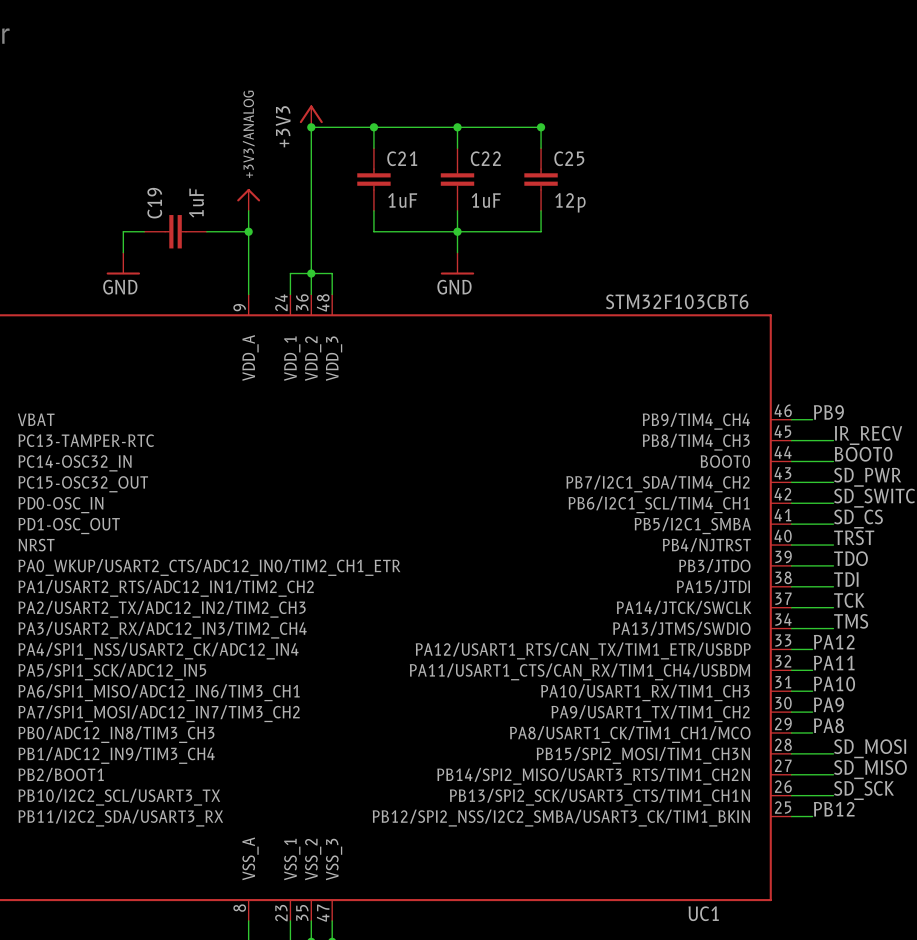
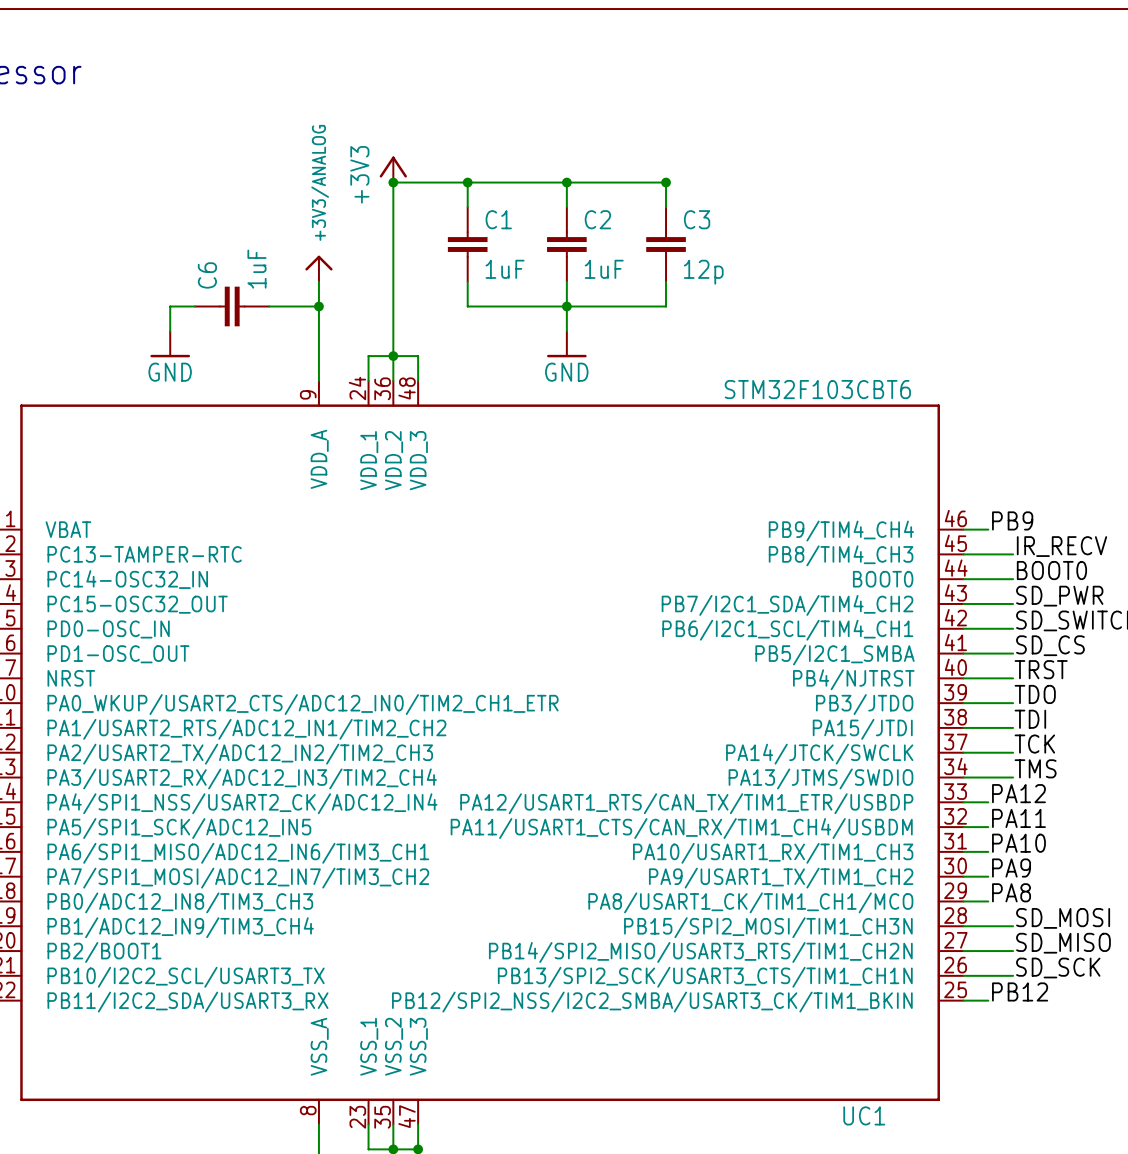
C21 name: C21 (402, 158) -> C1 (498, 219)
C22 name: C22 (485, 158) -> C2 (597, 219)
C25 name: C25 (569, 158) -> C3 (697, 219)
C19 name: C19 (154, 203) -> C6 (207, 275)

